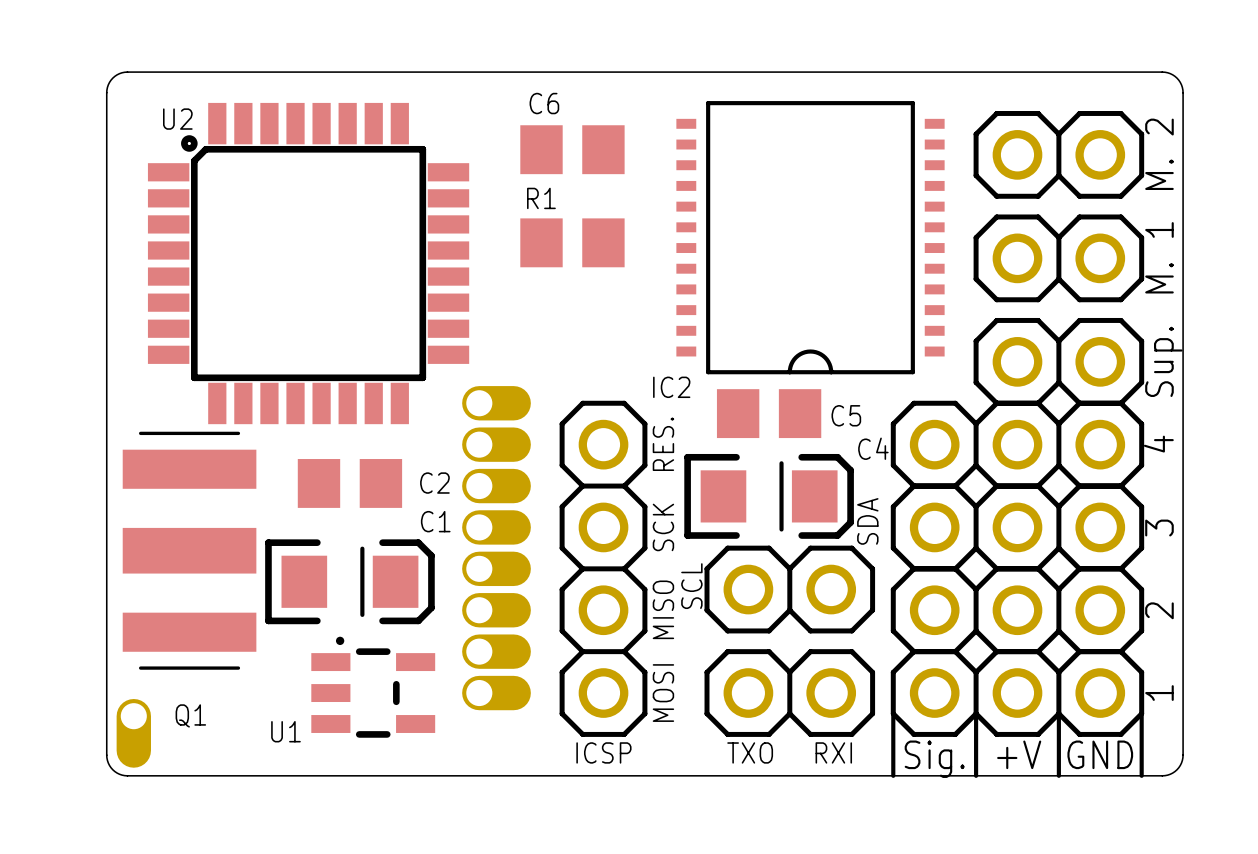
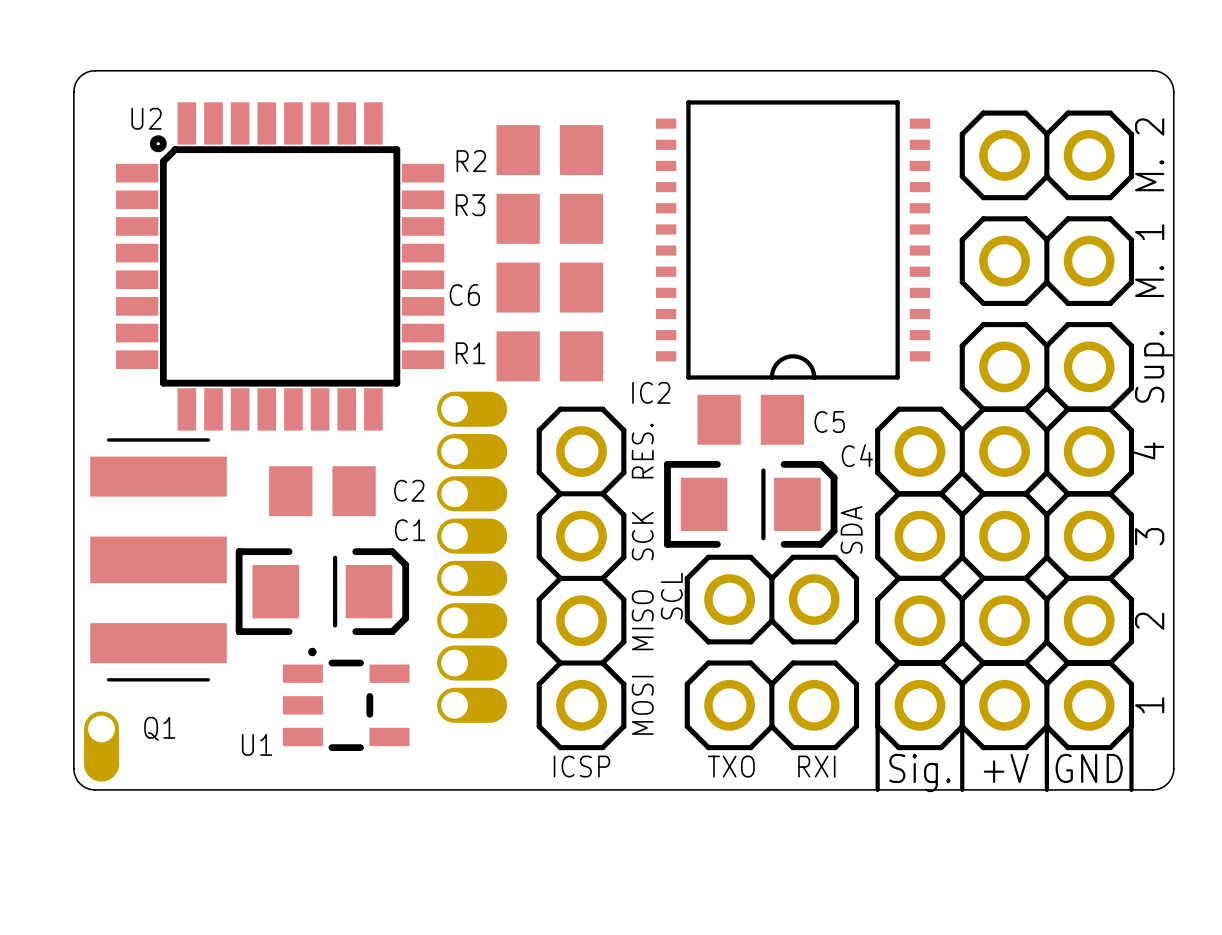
C6 name: C6 (544, 103) -> R2 (471, 161)
R1 name position: R1 (541, 198) -> R1 (470, 353)
R3: none -> (549, 218)
R1 position: (572, 242) -> (549, 356)
C6: none -> (549, 287)

